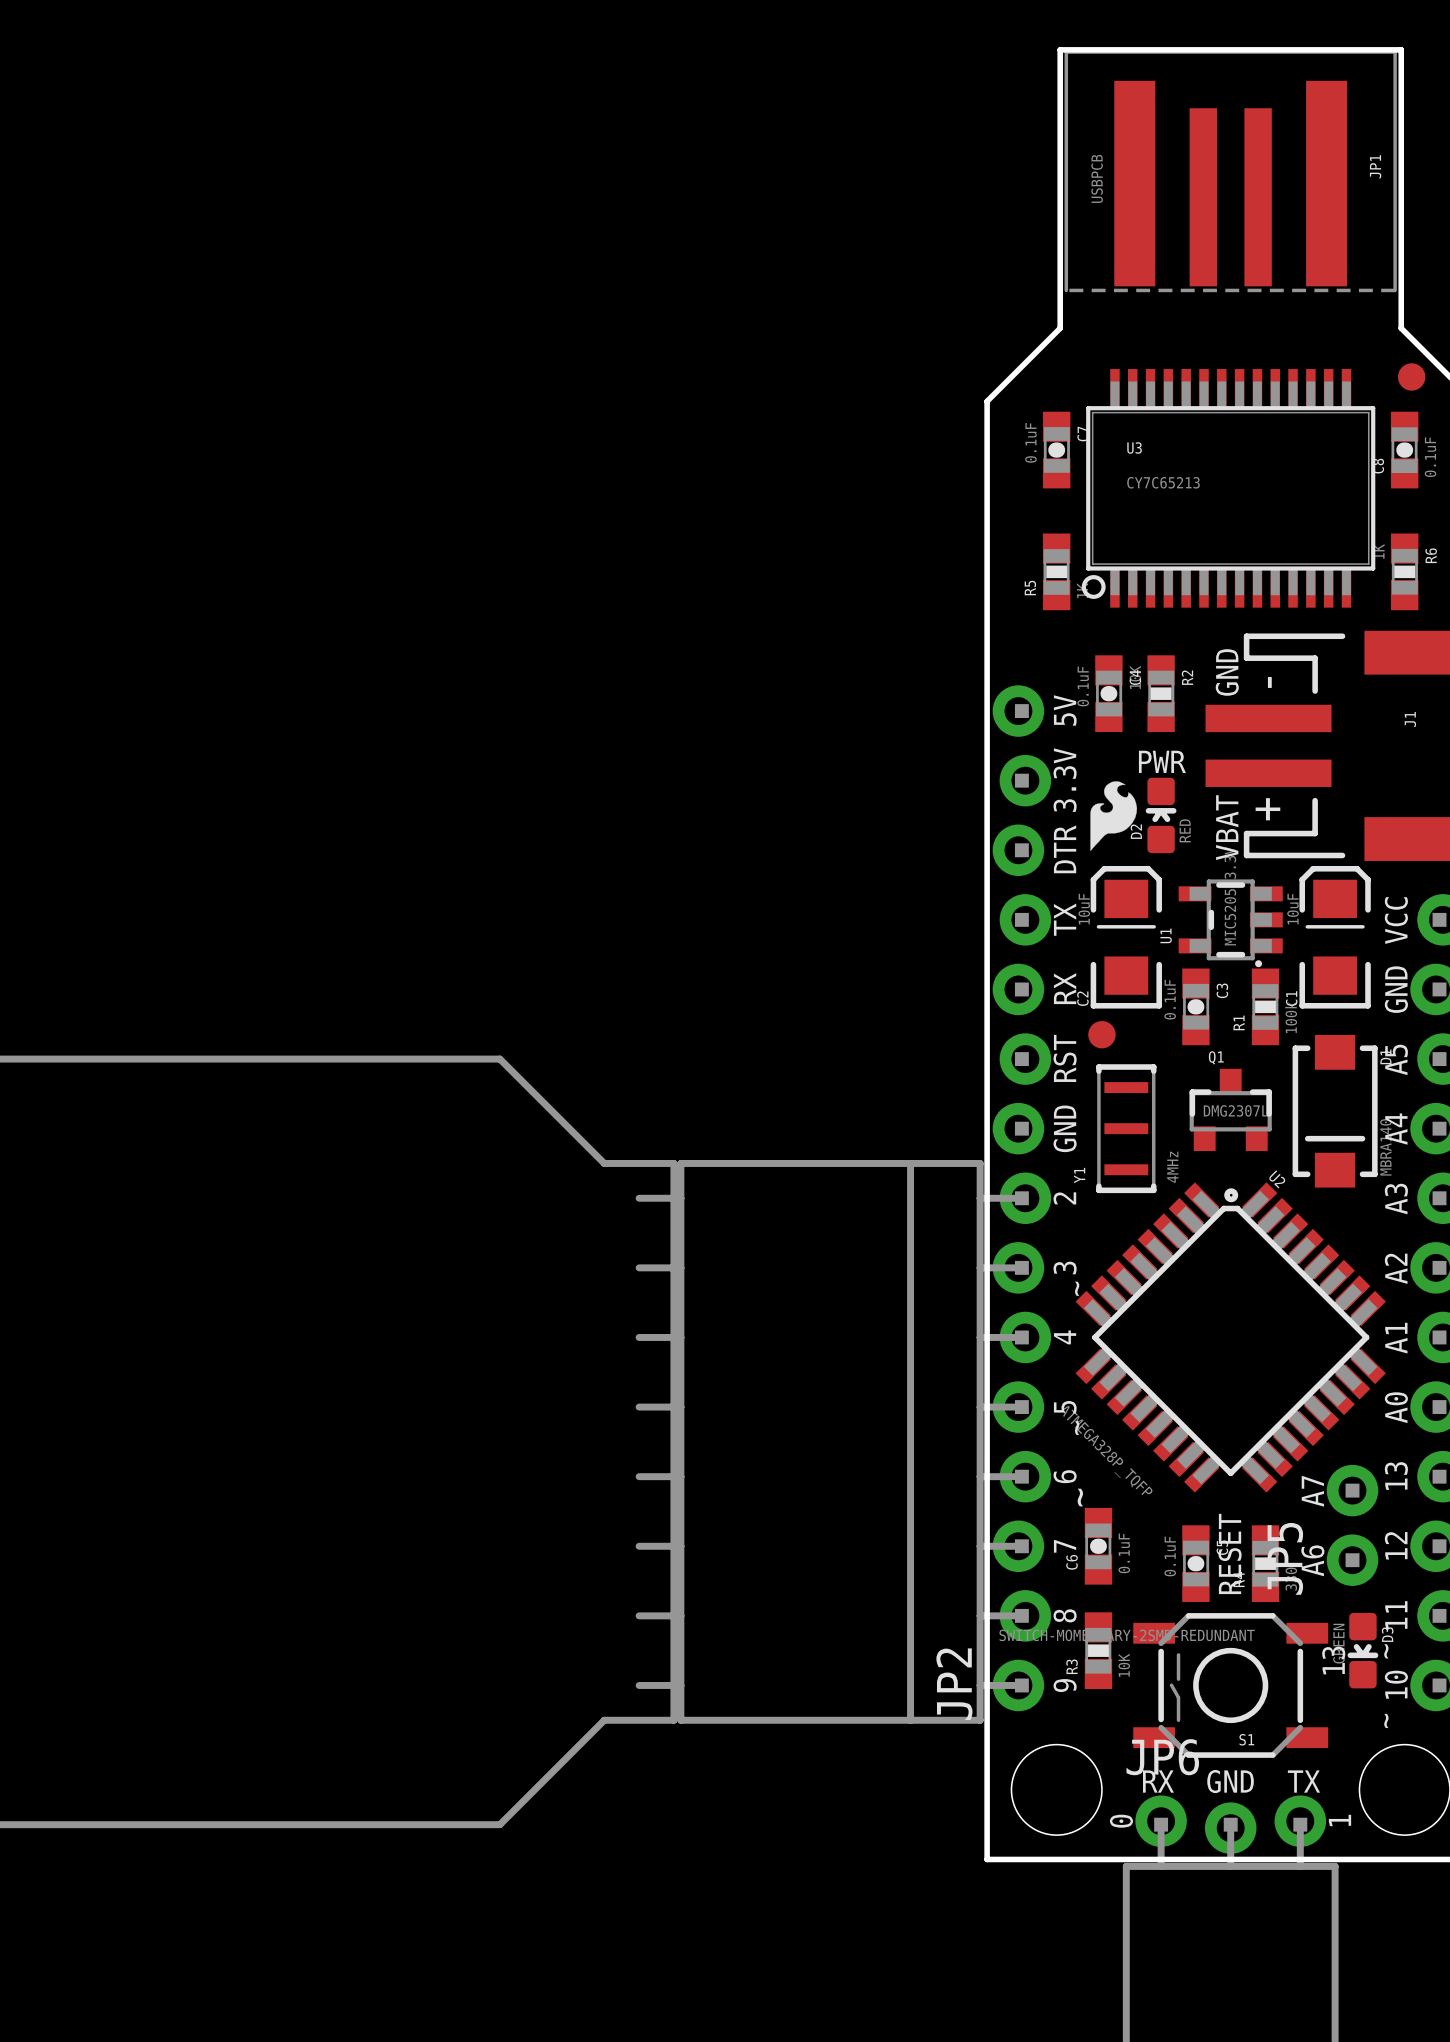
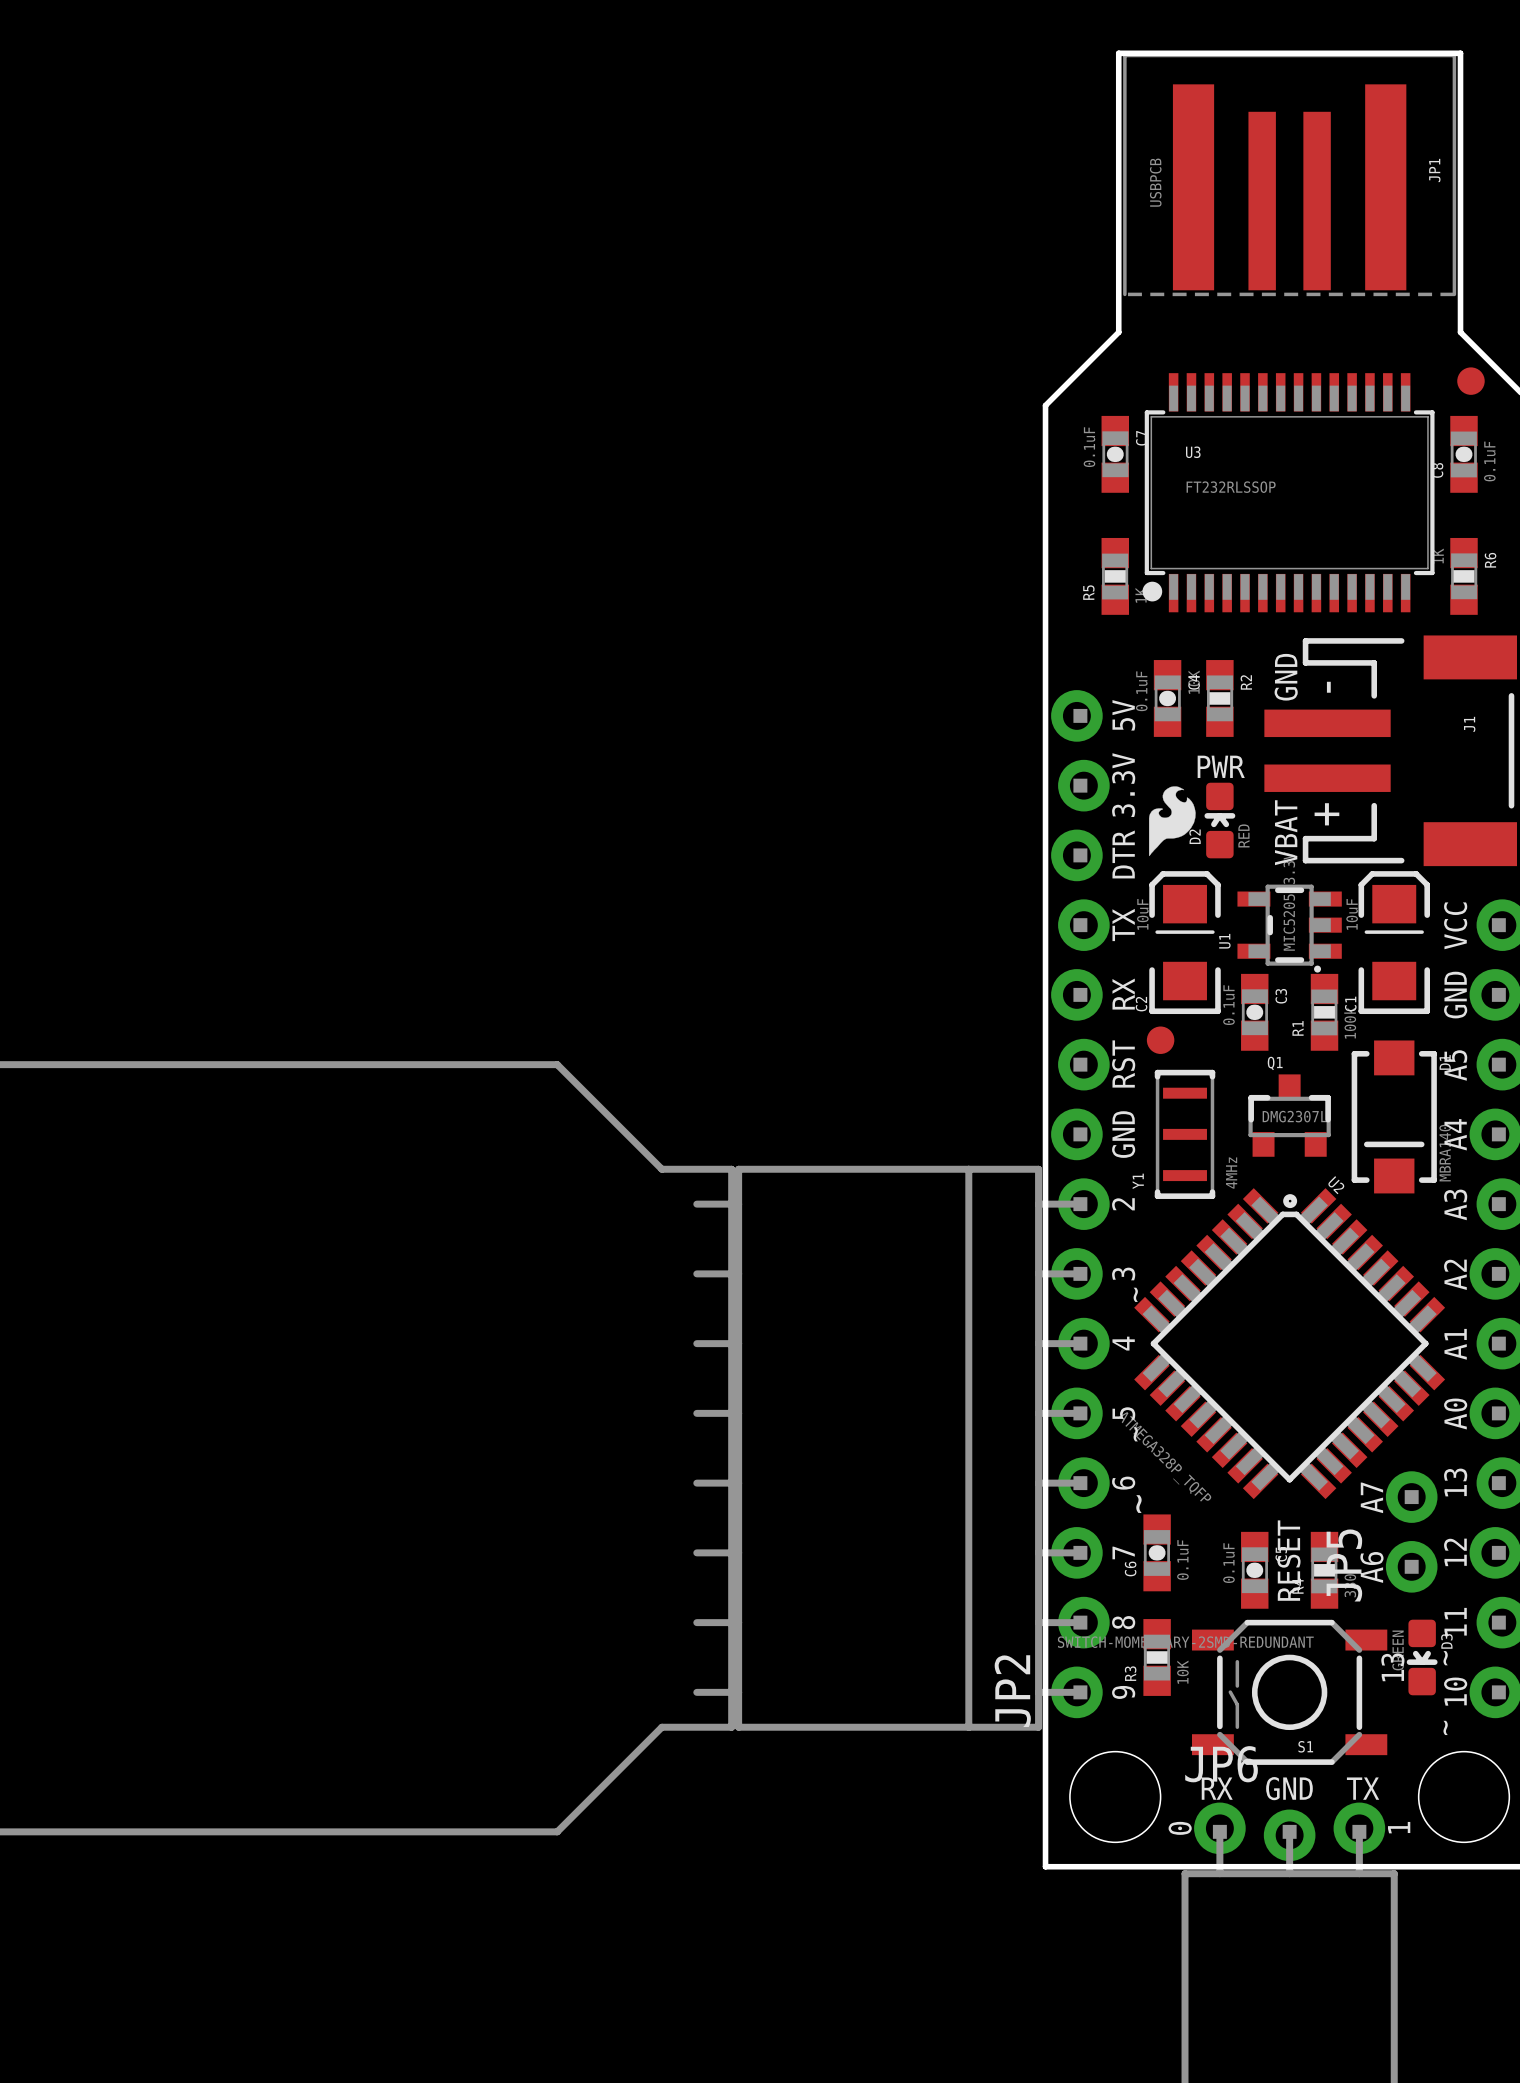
U3 footprint: [1081, 369, 1376, 608] -> [1142, 373, 1435, 613]
U3 value: CY7C65213 (1163, 482) -> FT232RLSSOP (1231, 487)

